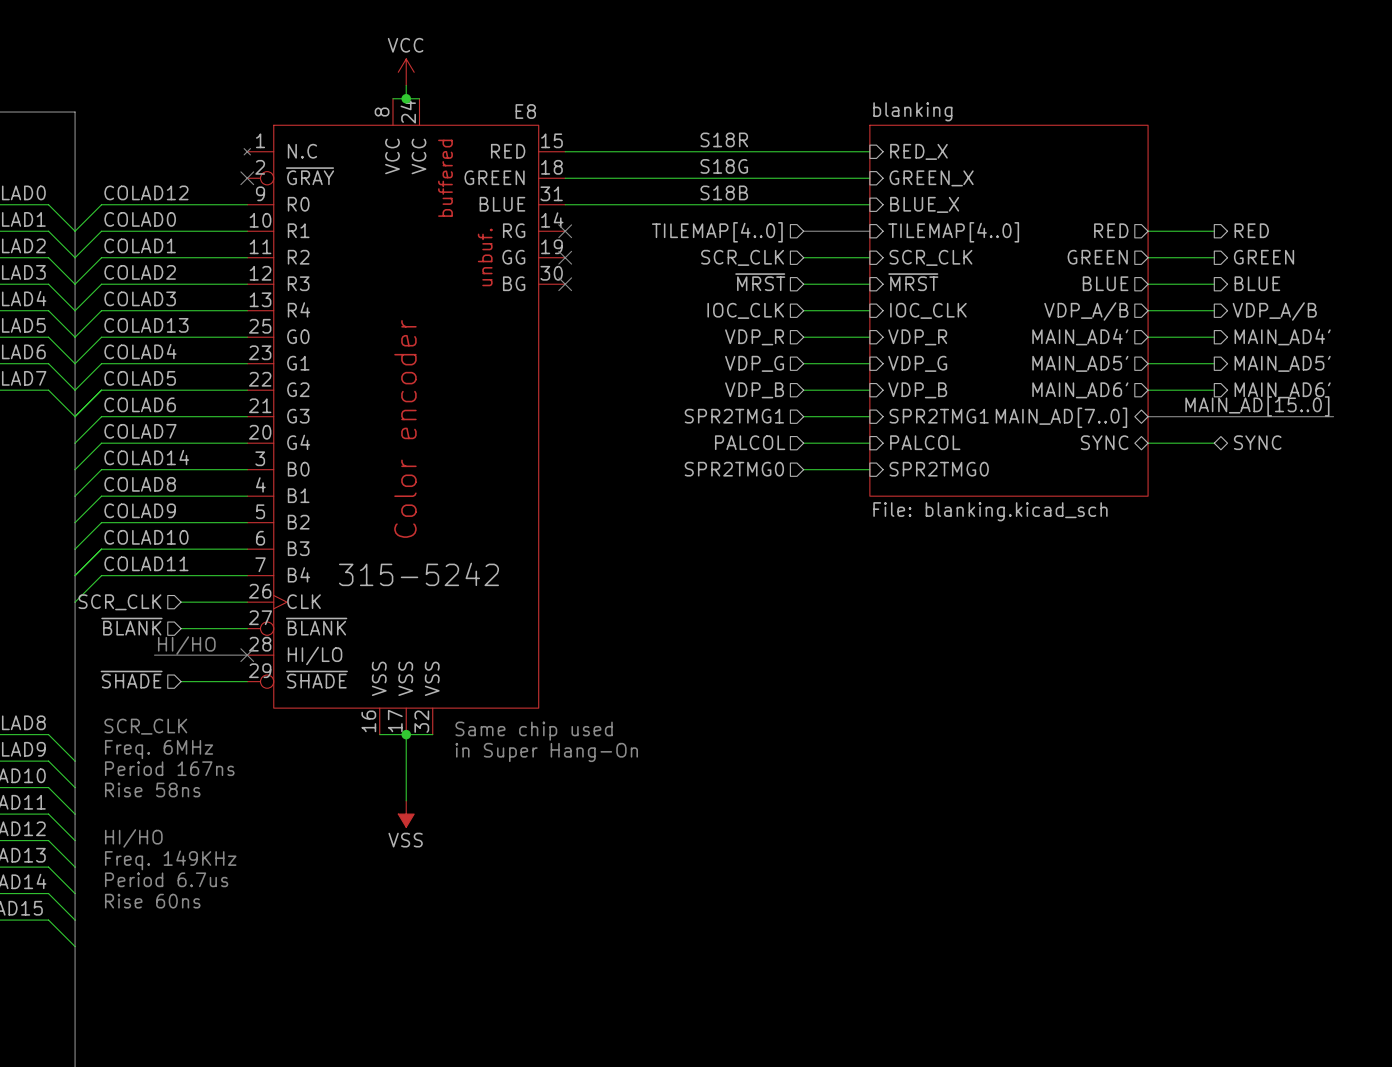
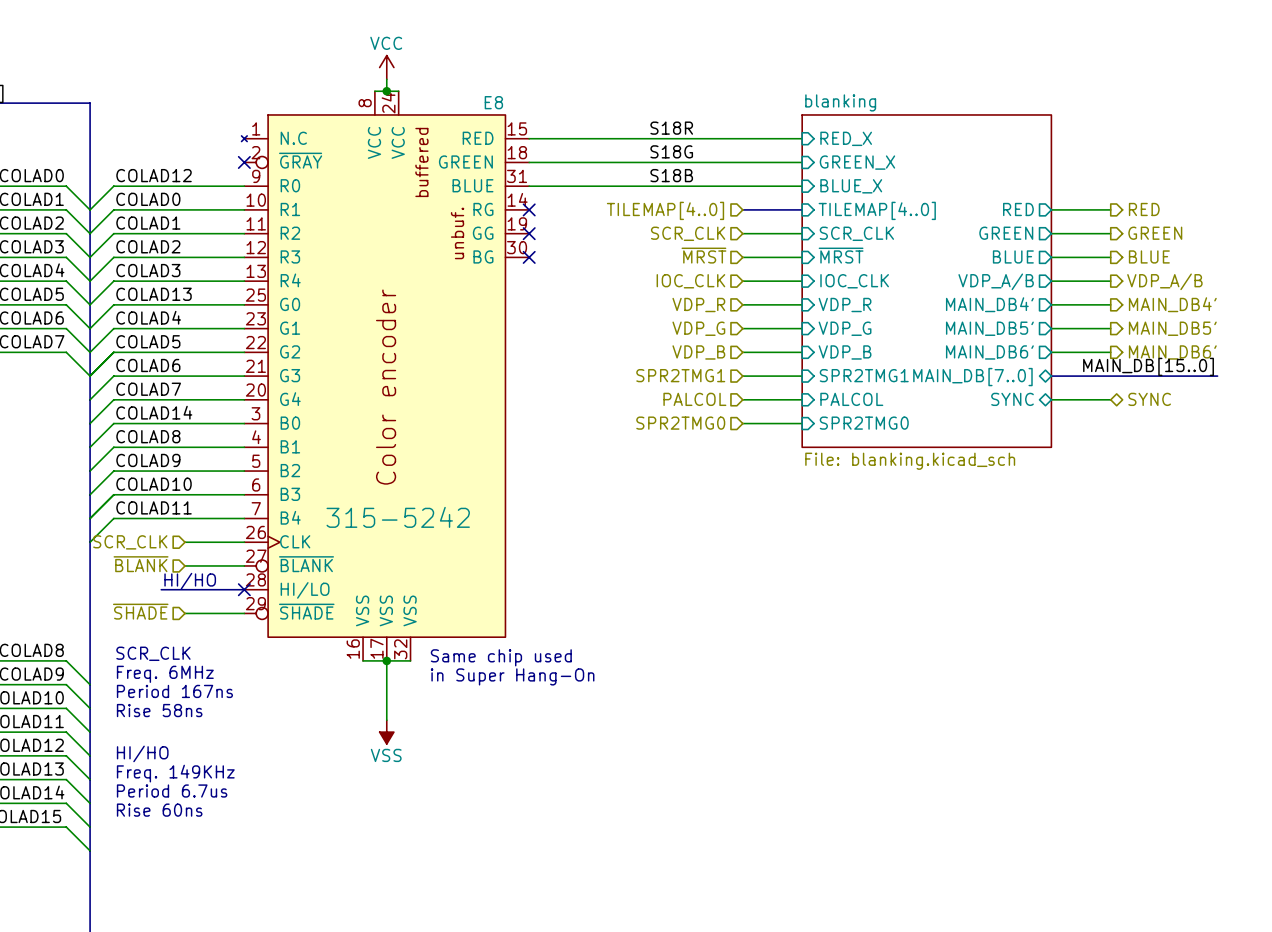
sheet pin: MAIN_AD4' (1080, 337) -> MAIN_DB4' (989, 304)
hierarchical label: MAIN_AD4' (1282, 337) -> MAIN_DB4' (1172, 304)
sheet pin: MAIN_AD5' (1080, 363) -> MAIN_DB5' (989, 328)
hierarchical label: MAIN_AD5' (1282, 363) -> MAIN_DB5' (1172, 328)
sheet pin: MAIN_AD6' (1080, 390) -> MAIN_DB6' (989, 352)
hierarchical label: MAIN_AD6' (1282, 390) -> MAIN_DB6' (1172, 352)
label: MAIN_AD[15..0] (1257, 406) -> MAIN_DB[15..0] (1148, 366)
sheet pin: MAIN_AD[7..0] (1061, 417) -> MAIN_DB[7..0] (972, 377)

